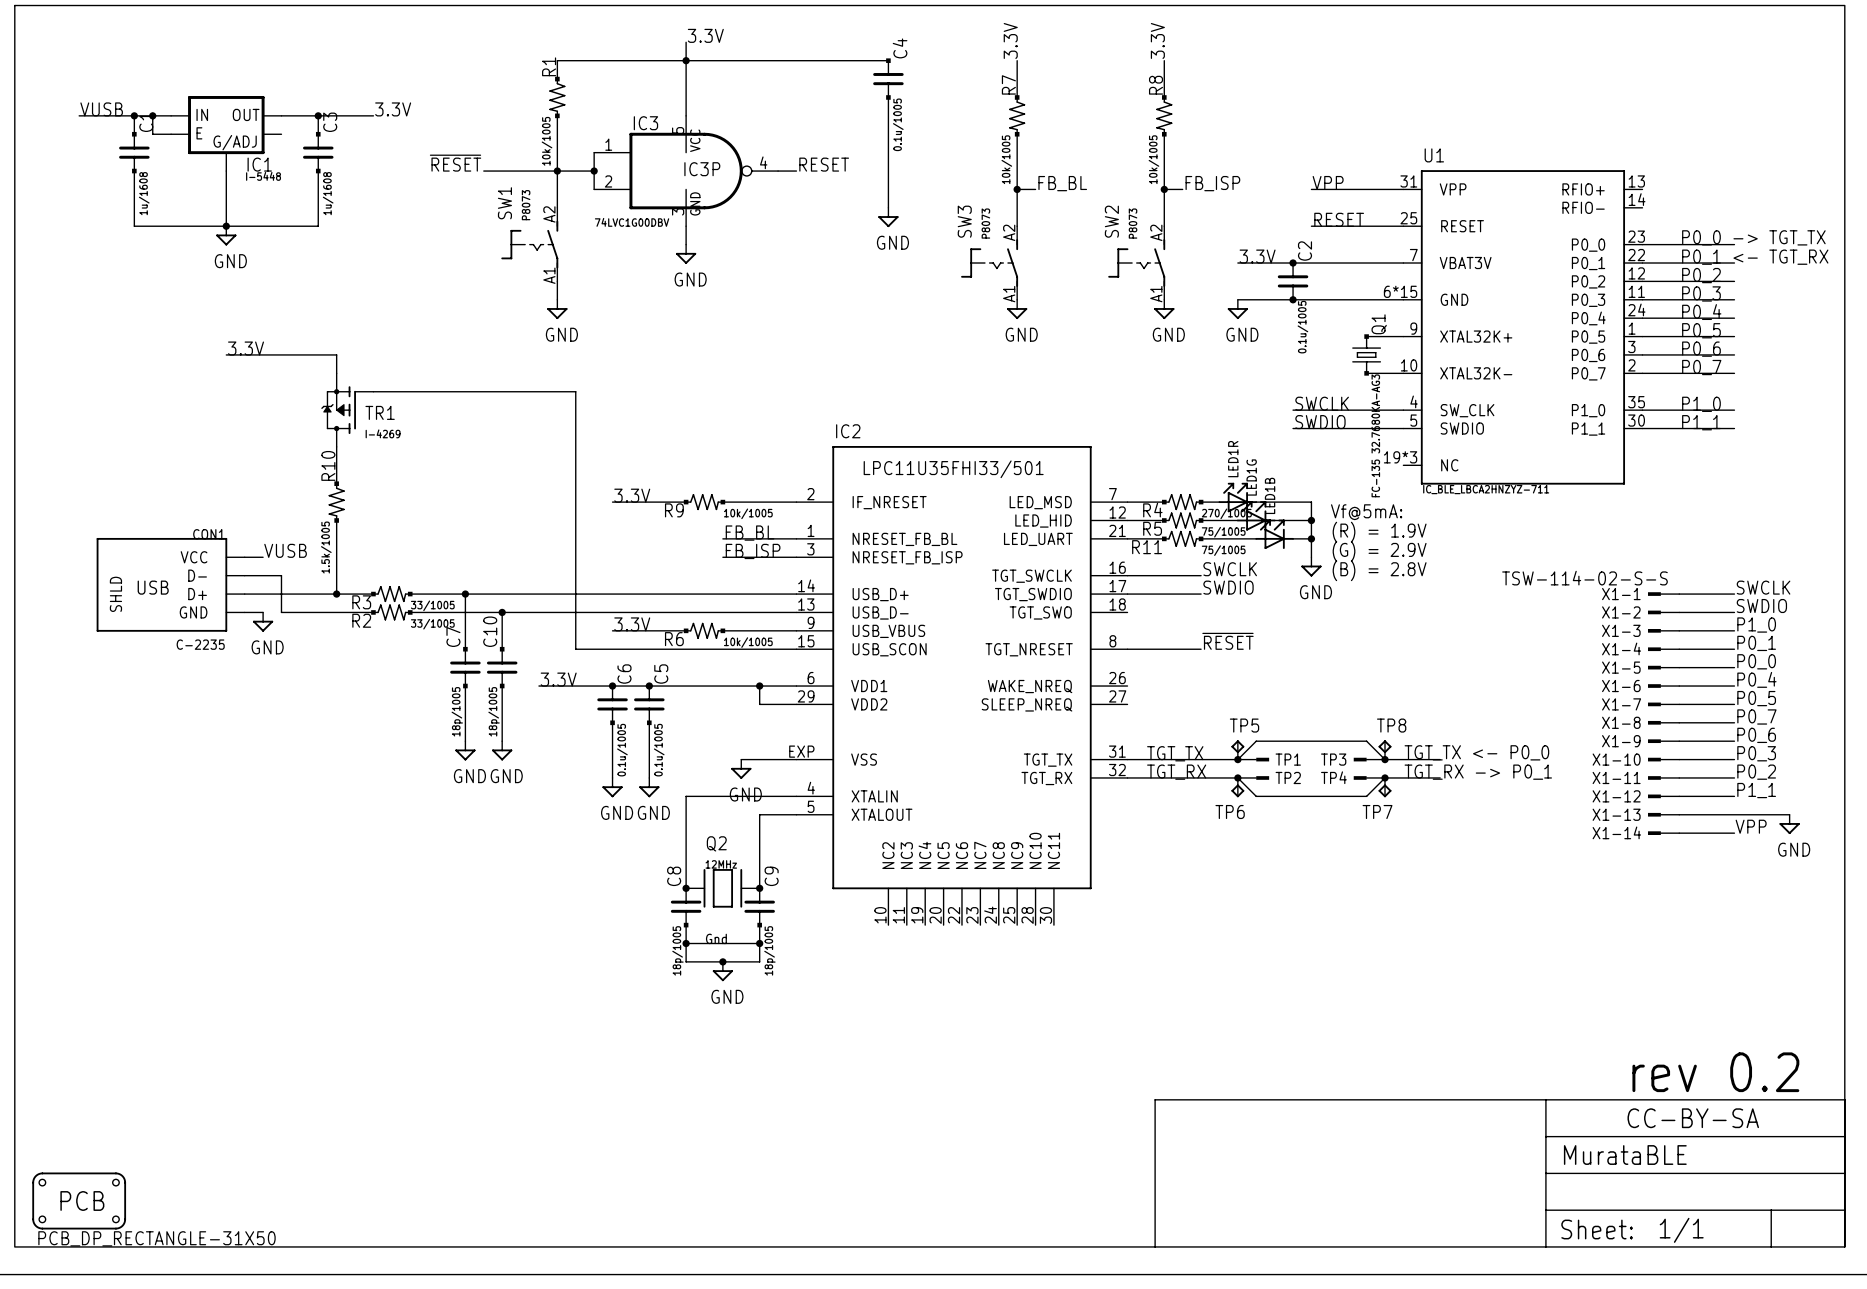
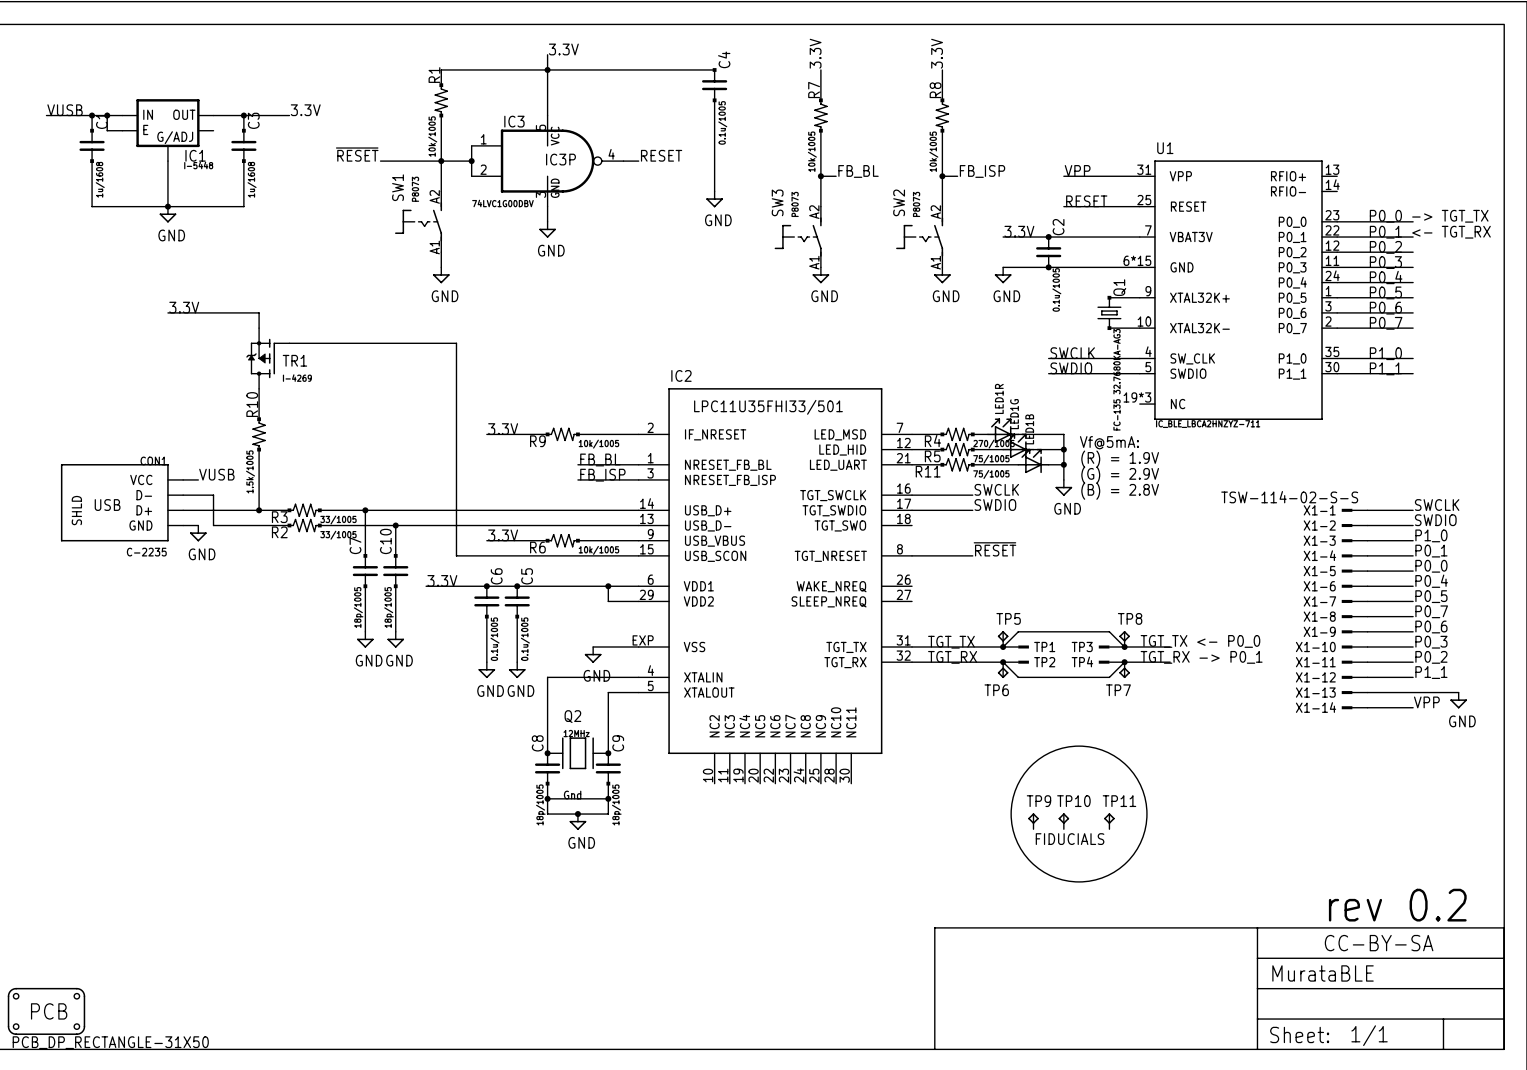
drawing: none -> [1010, 745, 1148, 883]
TP9: none -> (1033, 821)
TP10: none -> (1063, 821)
TP11: none -> (1109, 821)
text: none -> FIDUCIALS (1070, 839)

